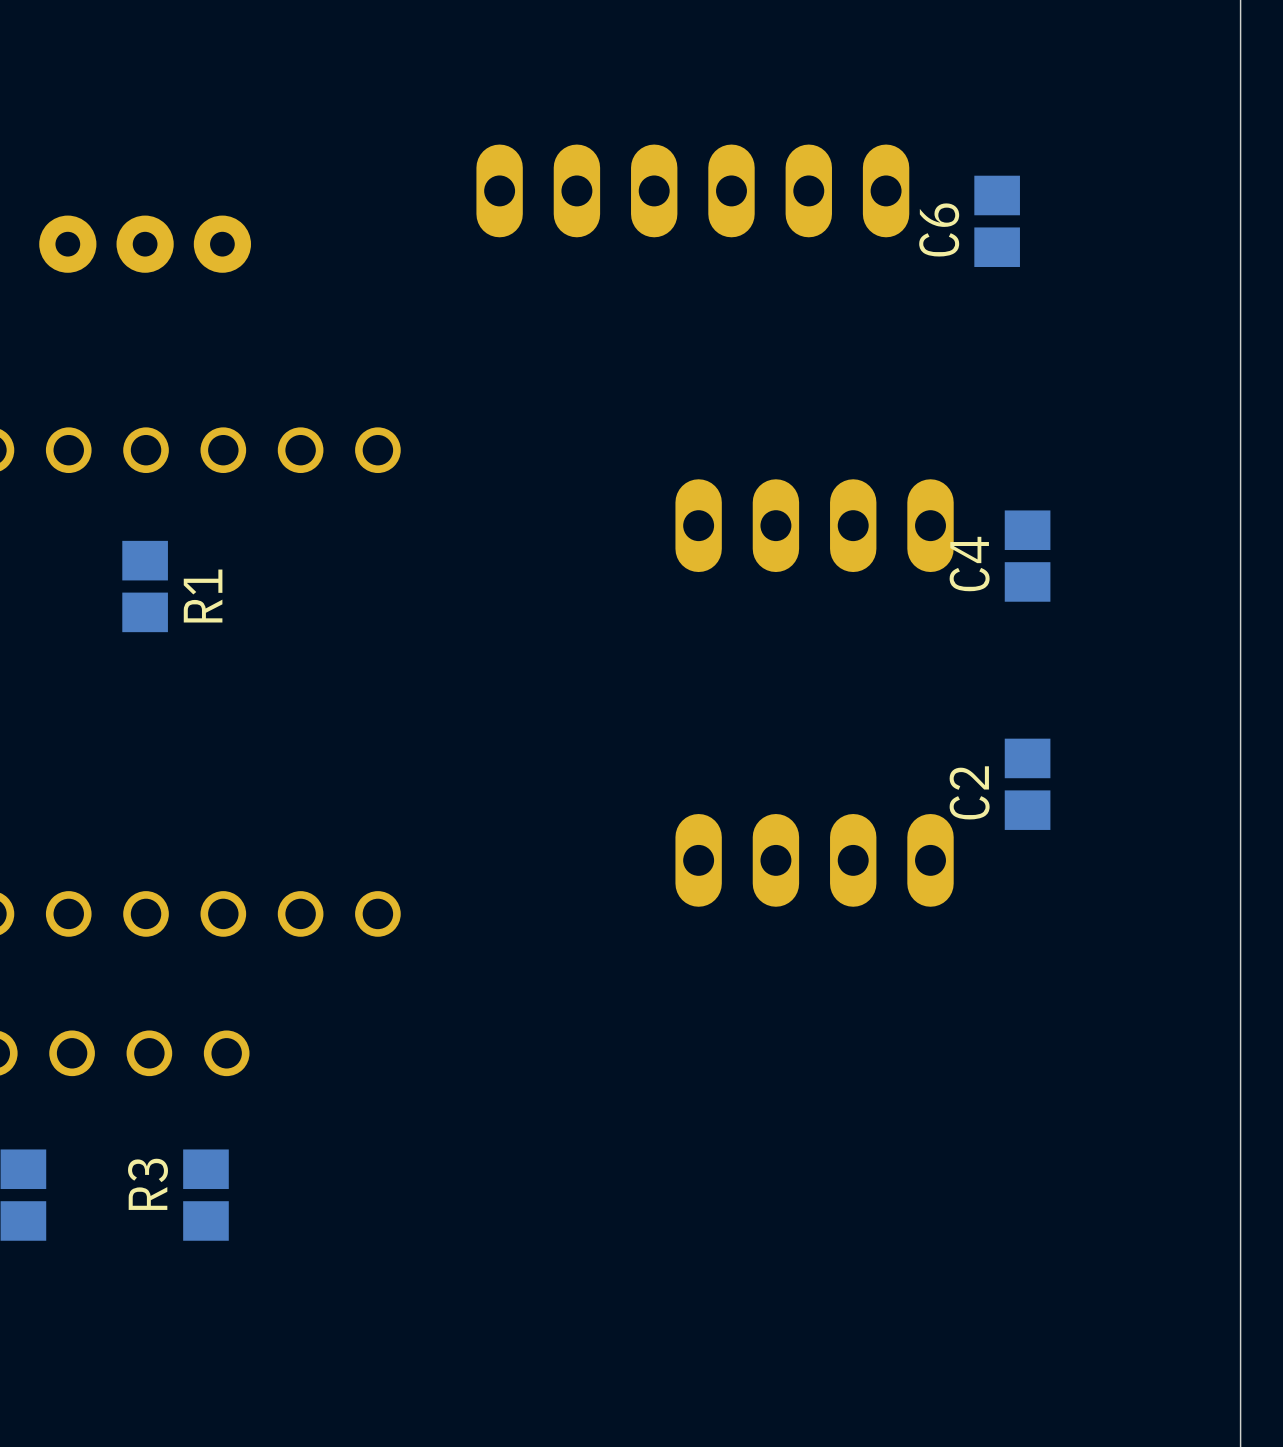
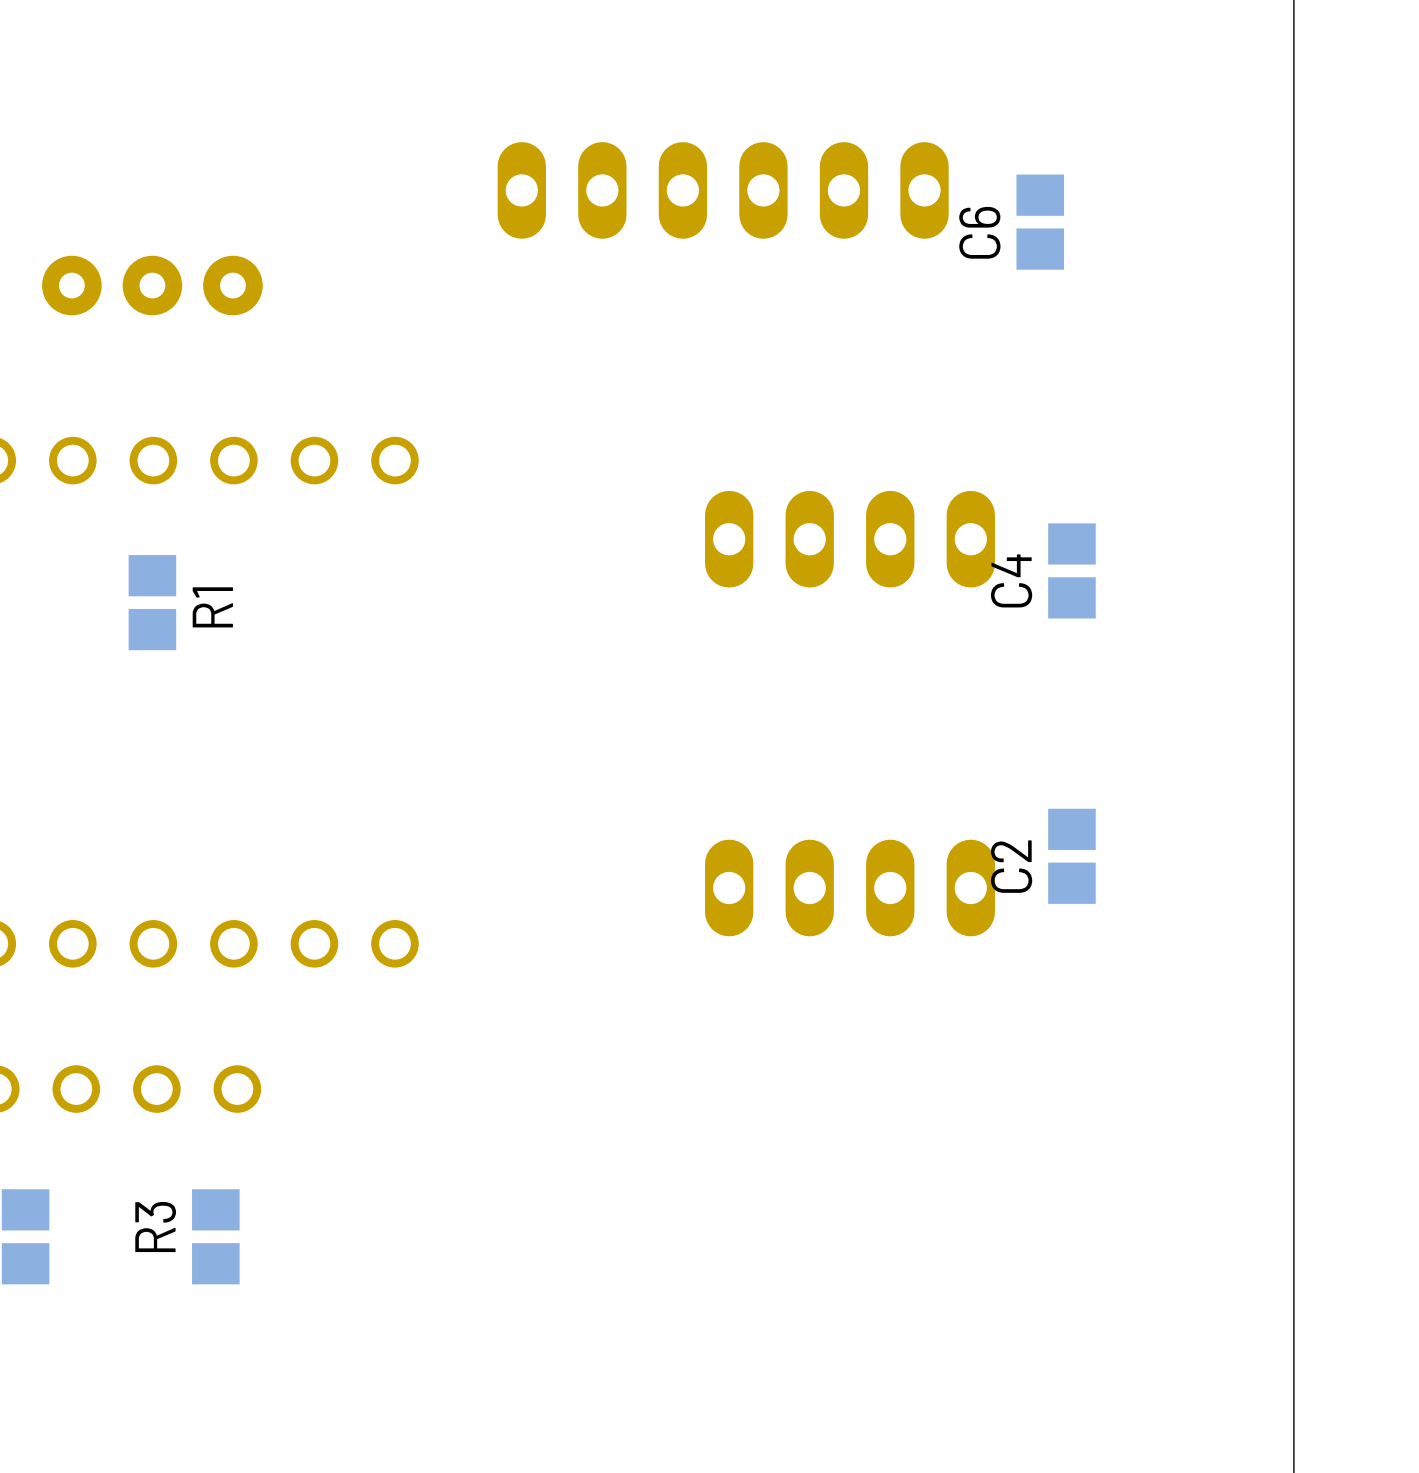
part position: (145, 244) -> (152, 285)
C2 position: (1027, 784) -> (1071, 856)

